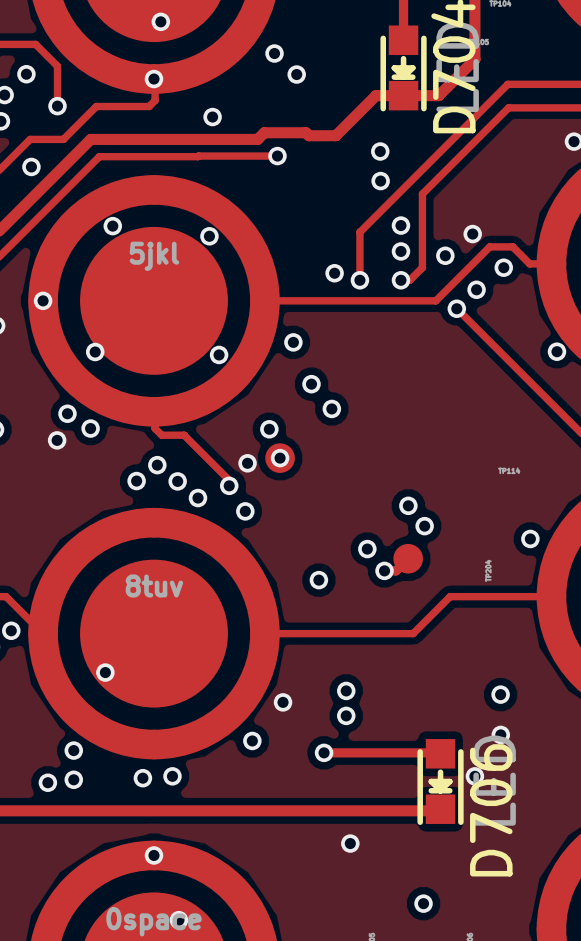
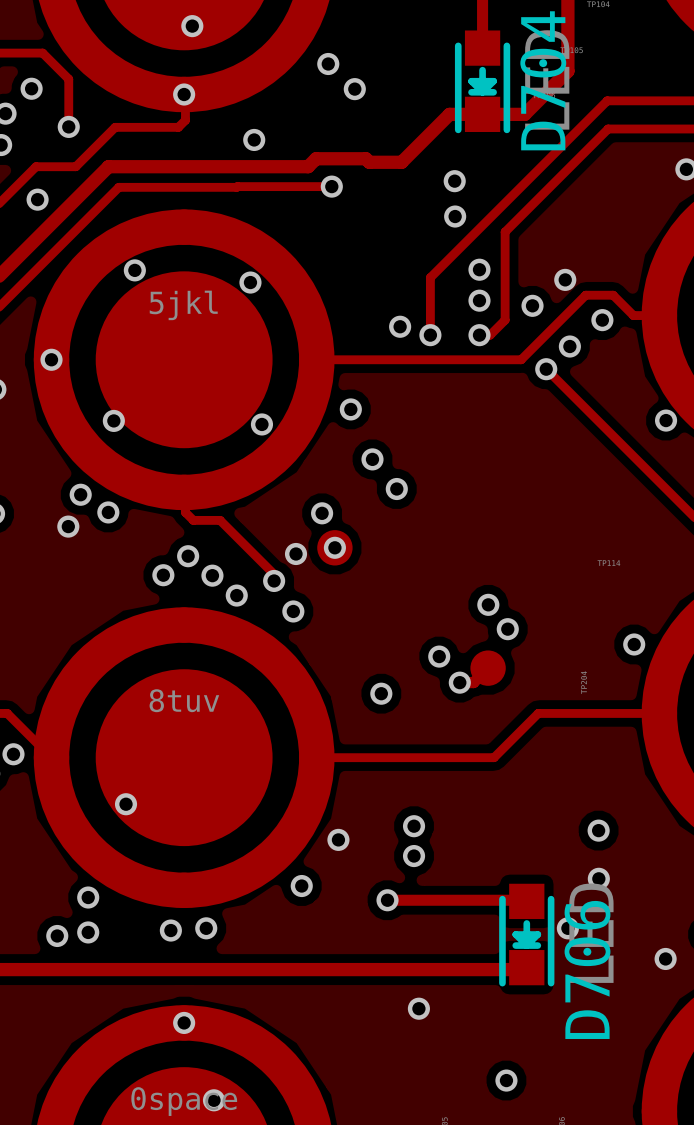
via: none -> (665, 958)

